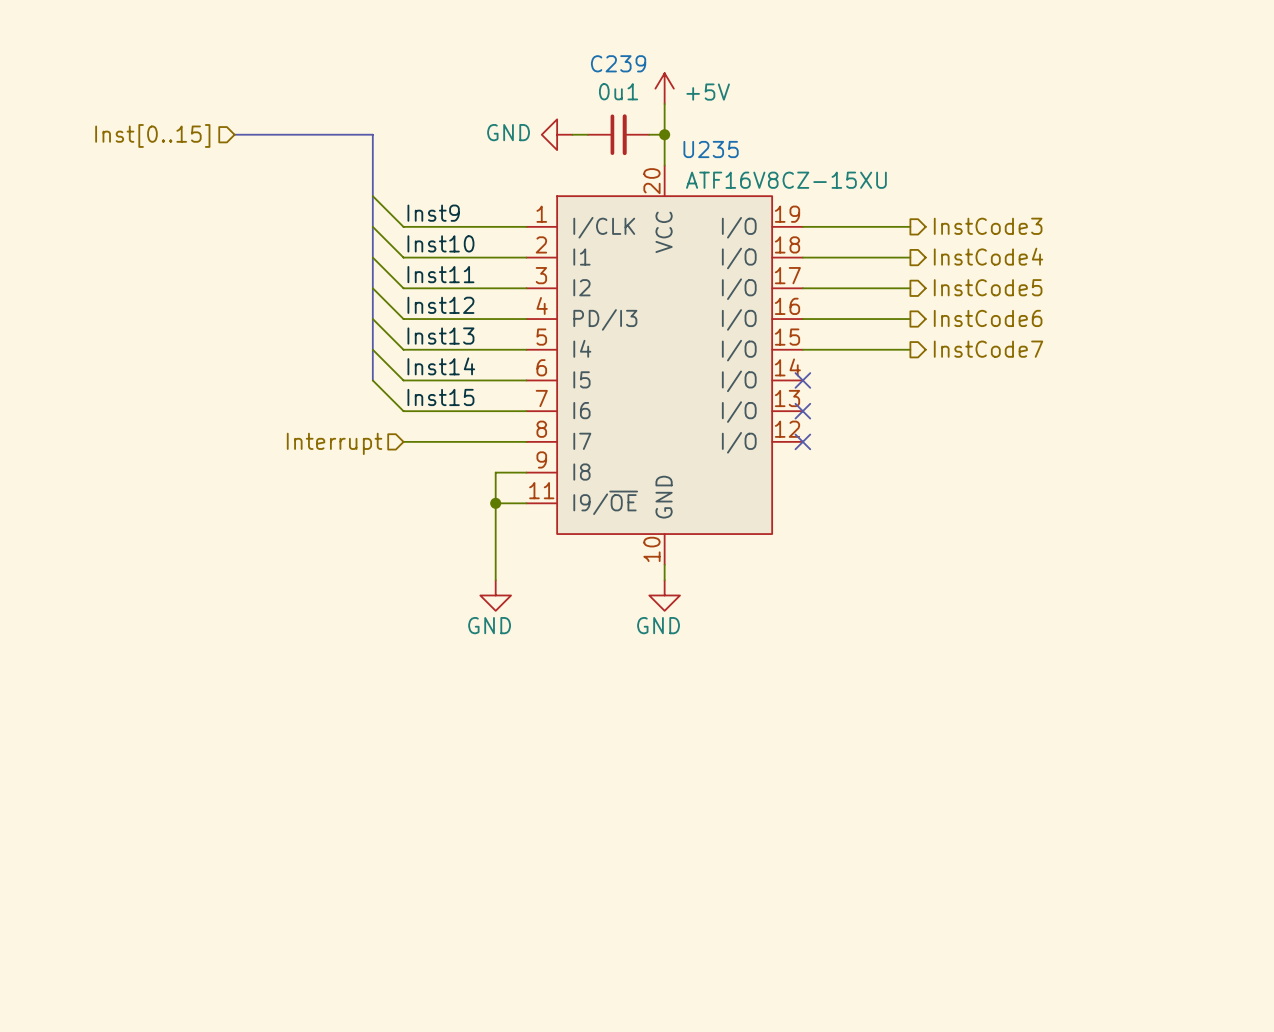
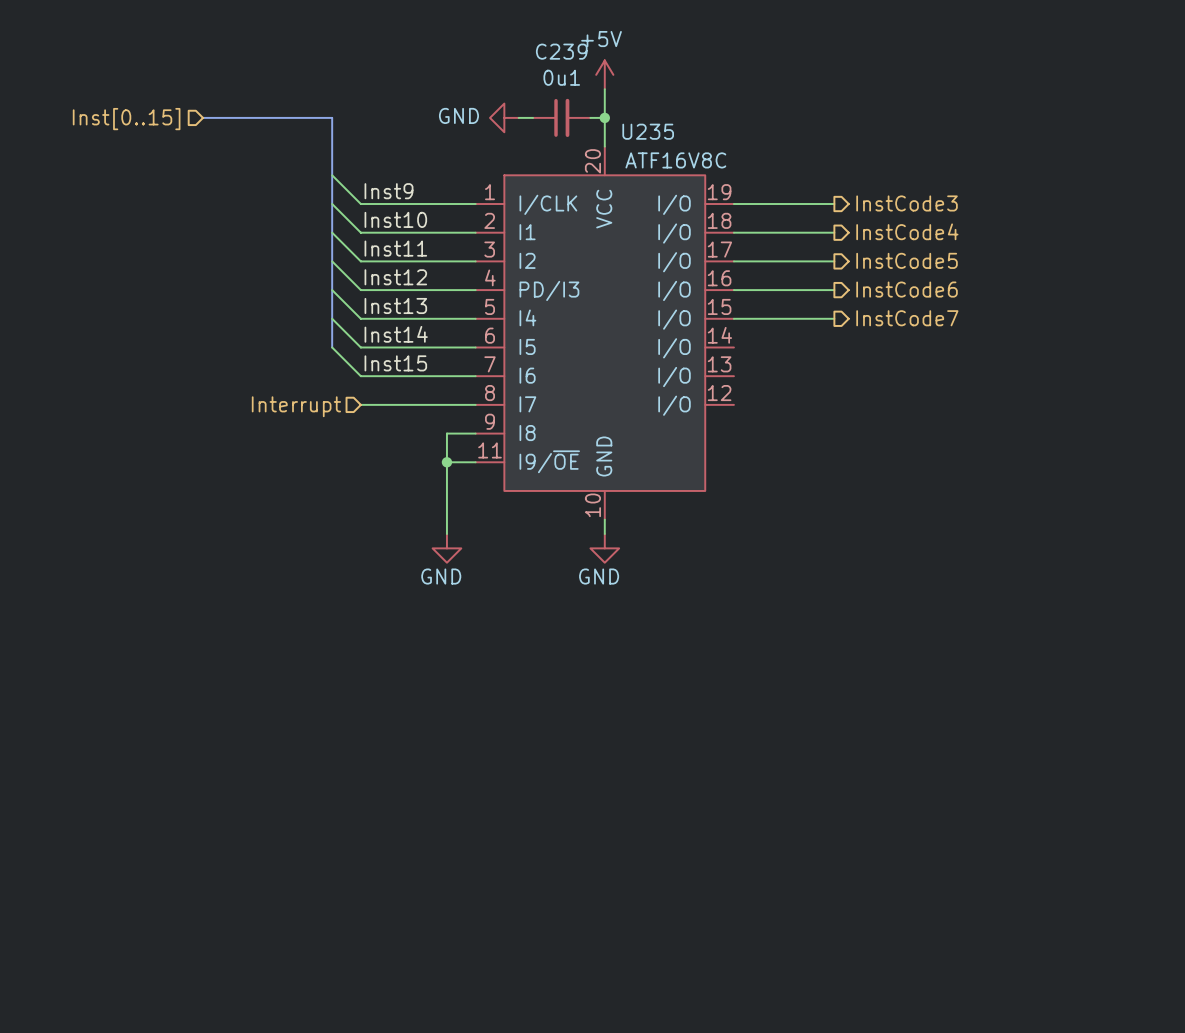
power symbol text position: +5V (708, 92) -> +5V (601, 39)
U235 value: ATF16V8CZ-15XU (786, 180) -> ATF16V8C (675, 160)
no-connect mark: (802, 380) -> none
no-connect mark: (802, 411) -> none
no-connect mark: (802, 441) -> none

